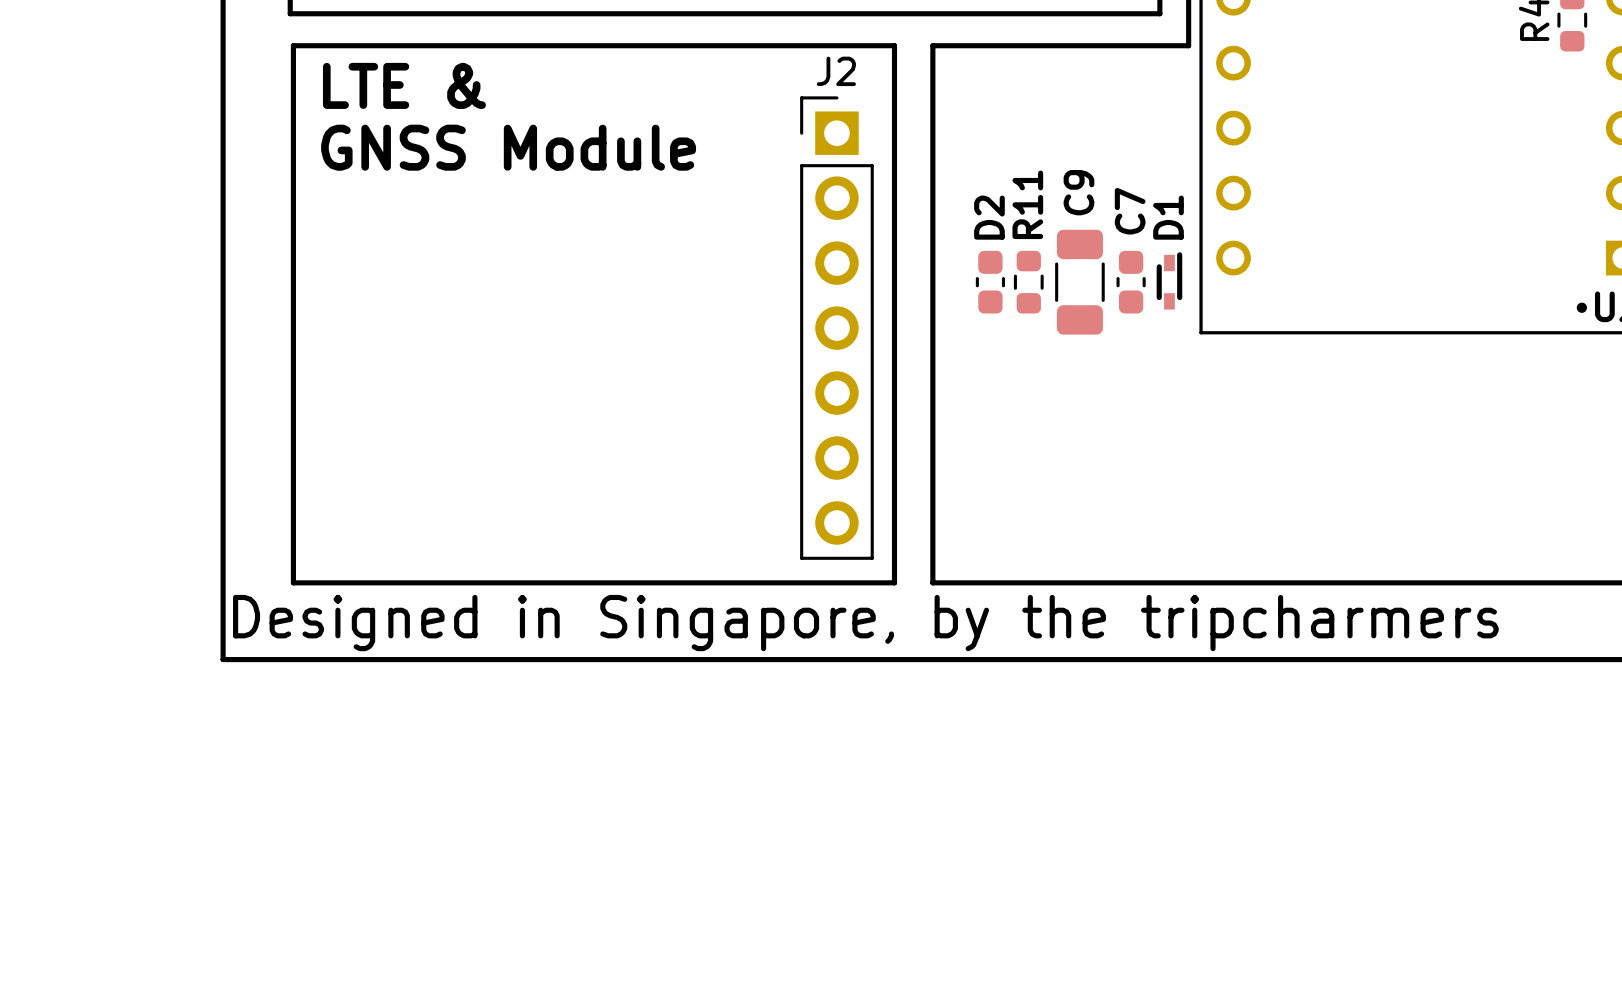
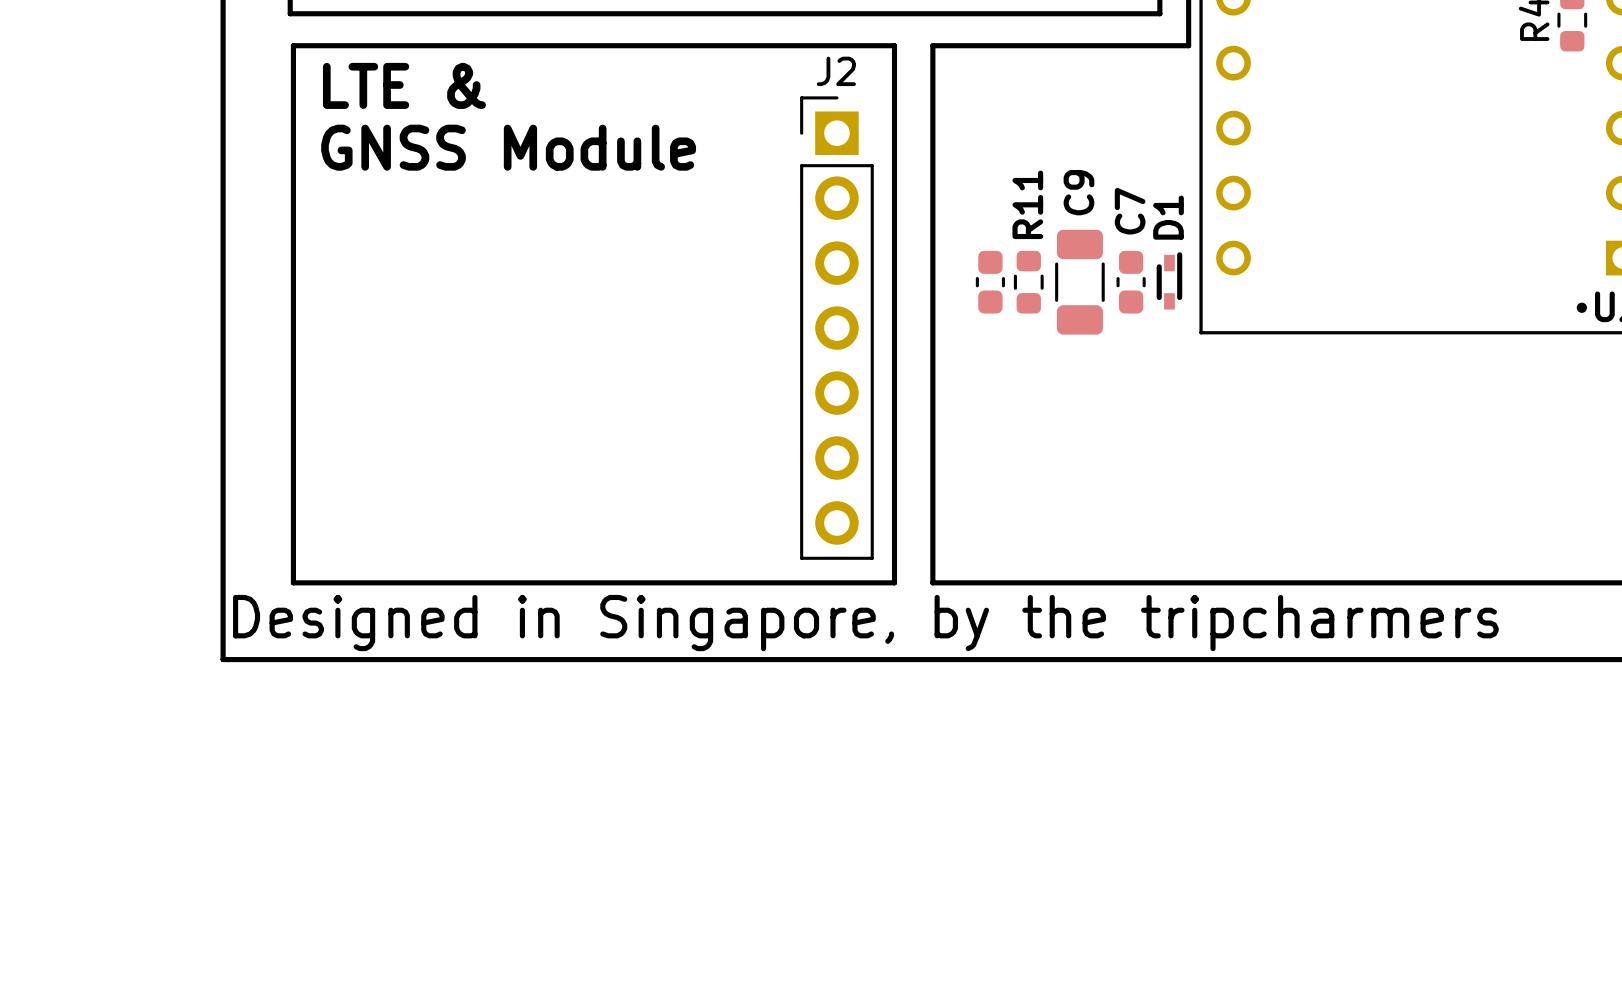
D2 name: D2 (989, 217) -> none

